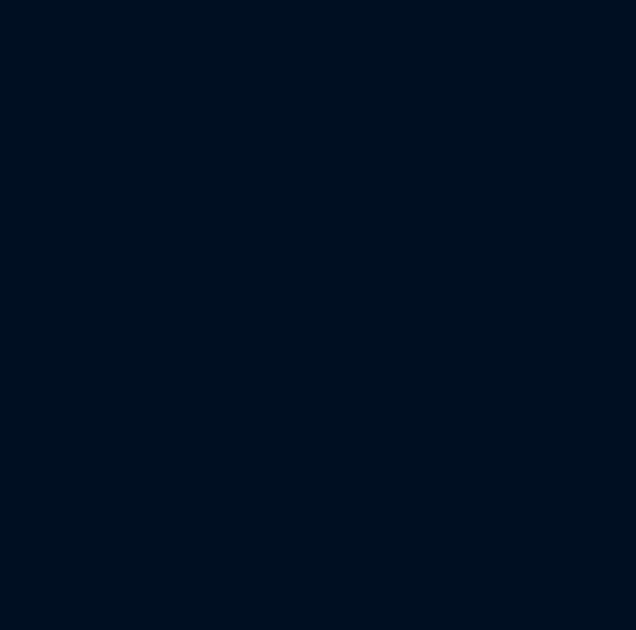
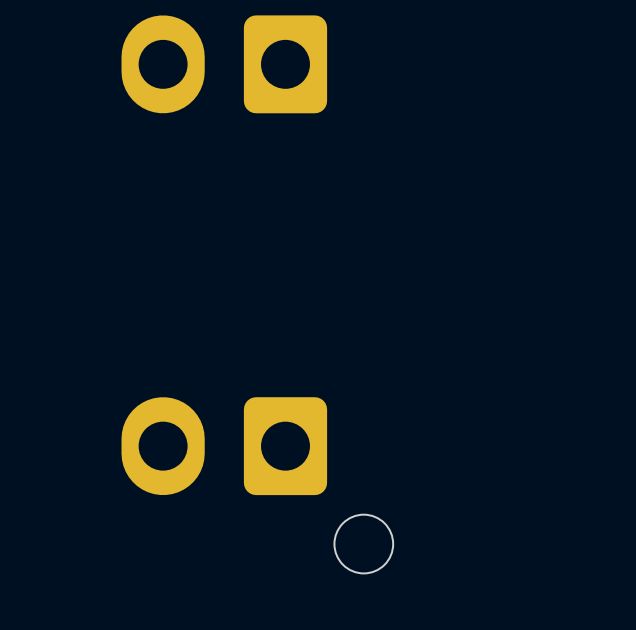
part: none -> (224, 64)
part: none -> (257, 485)

